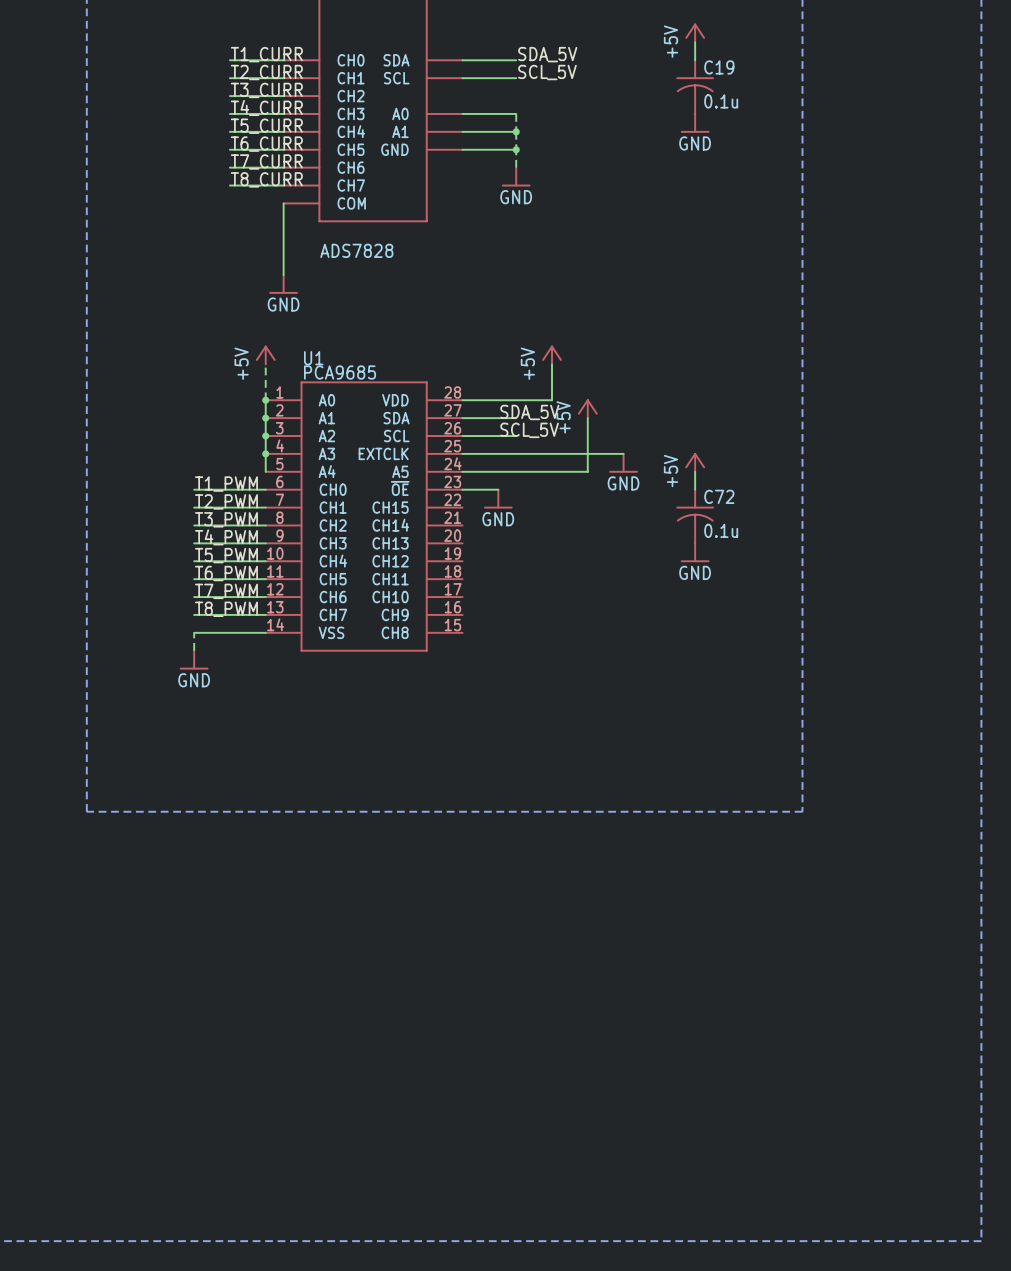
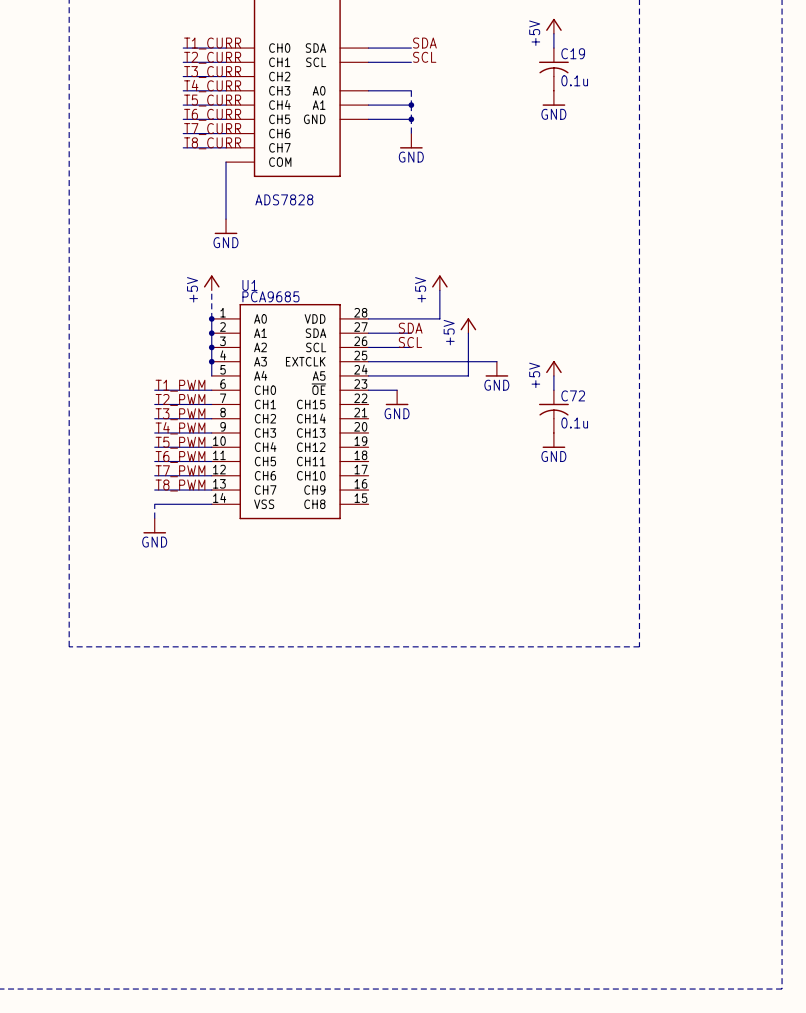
label: SDA_5V (547, 54) -> SDA (424, 43)
label: SCL_5V (547, 72) -> SCL (424, 57)
label: SDA_5V (529, 412) -> SDA (410, 328)
label: SCL_5V (529, 430) -> SCL (410, 342)

